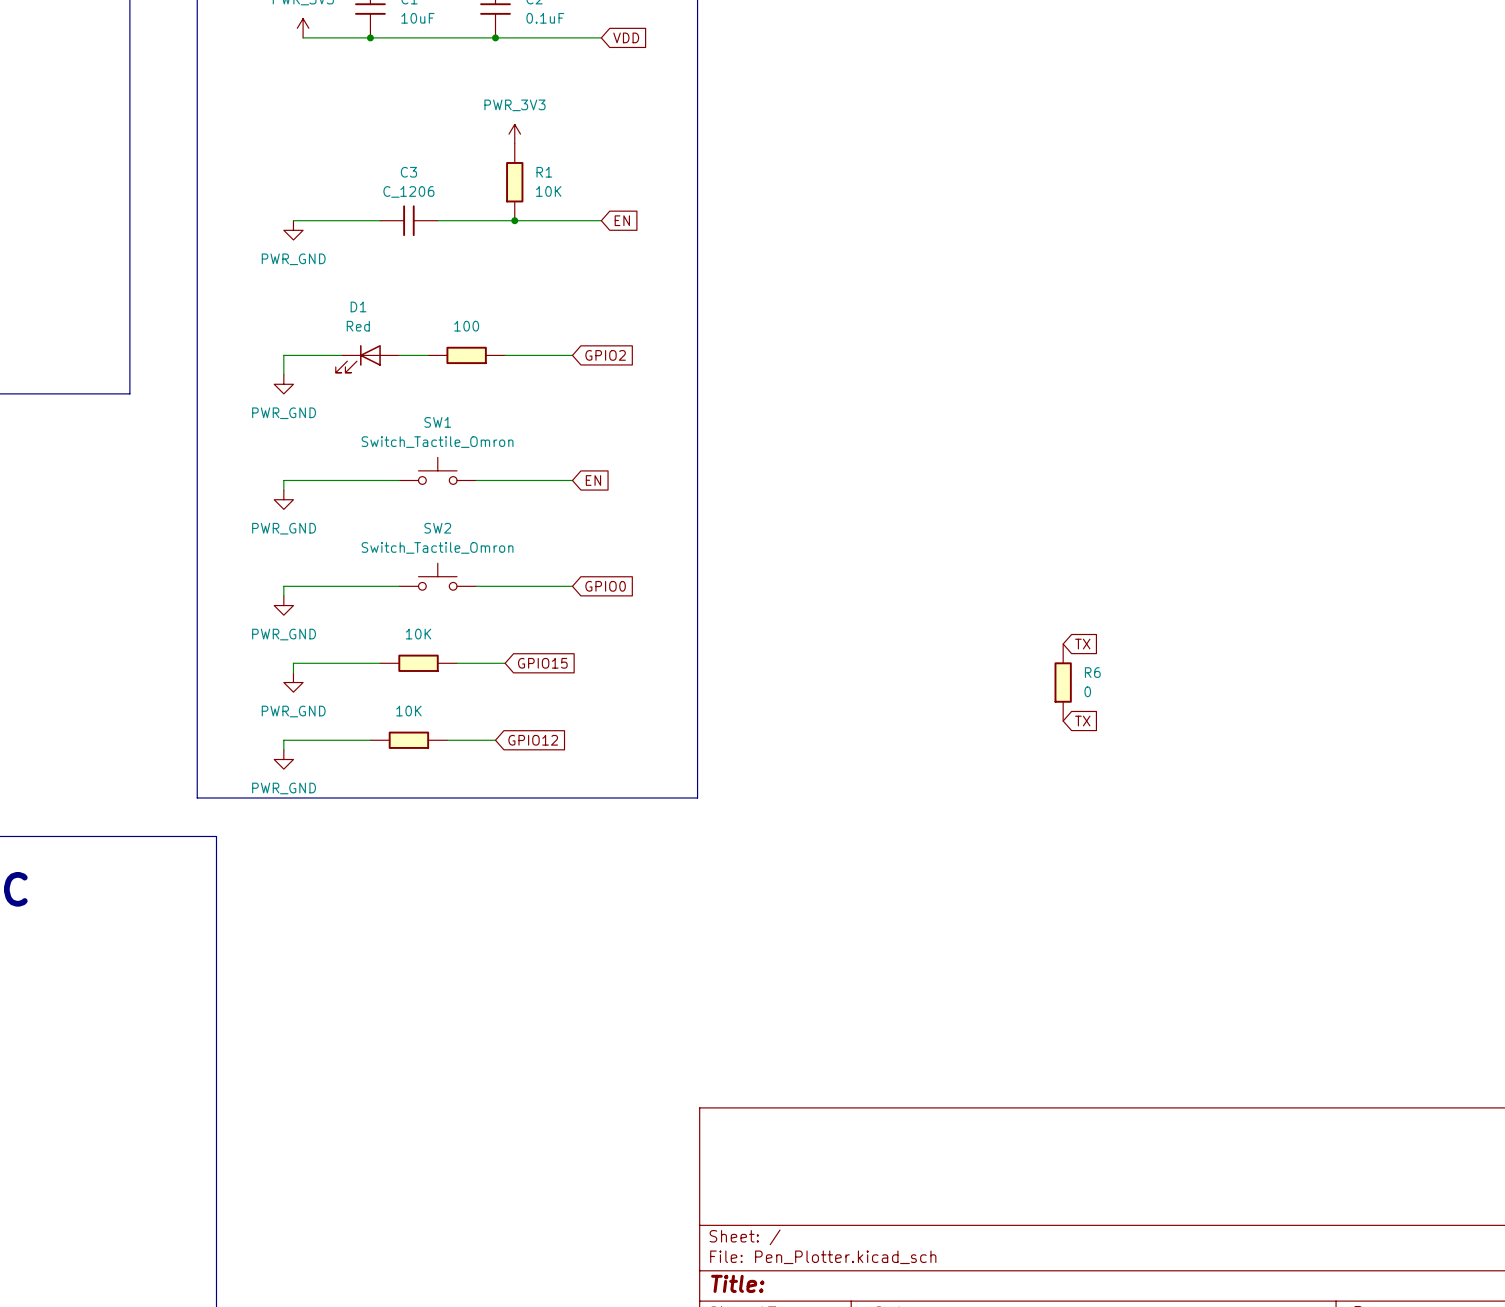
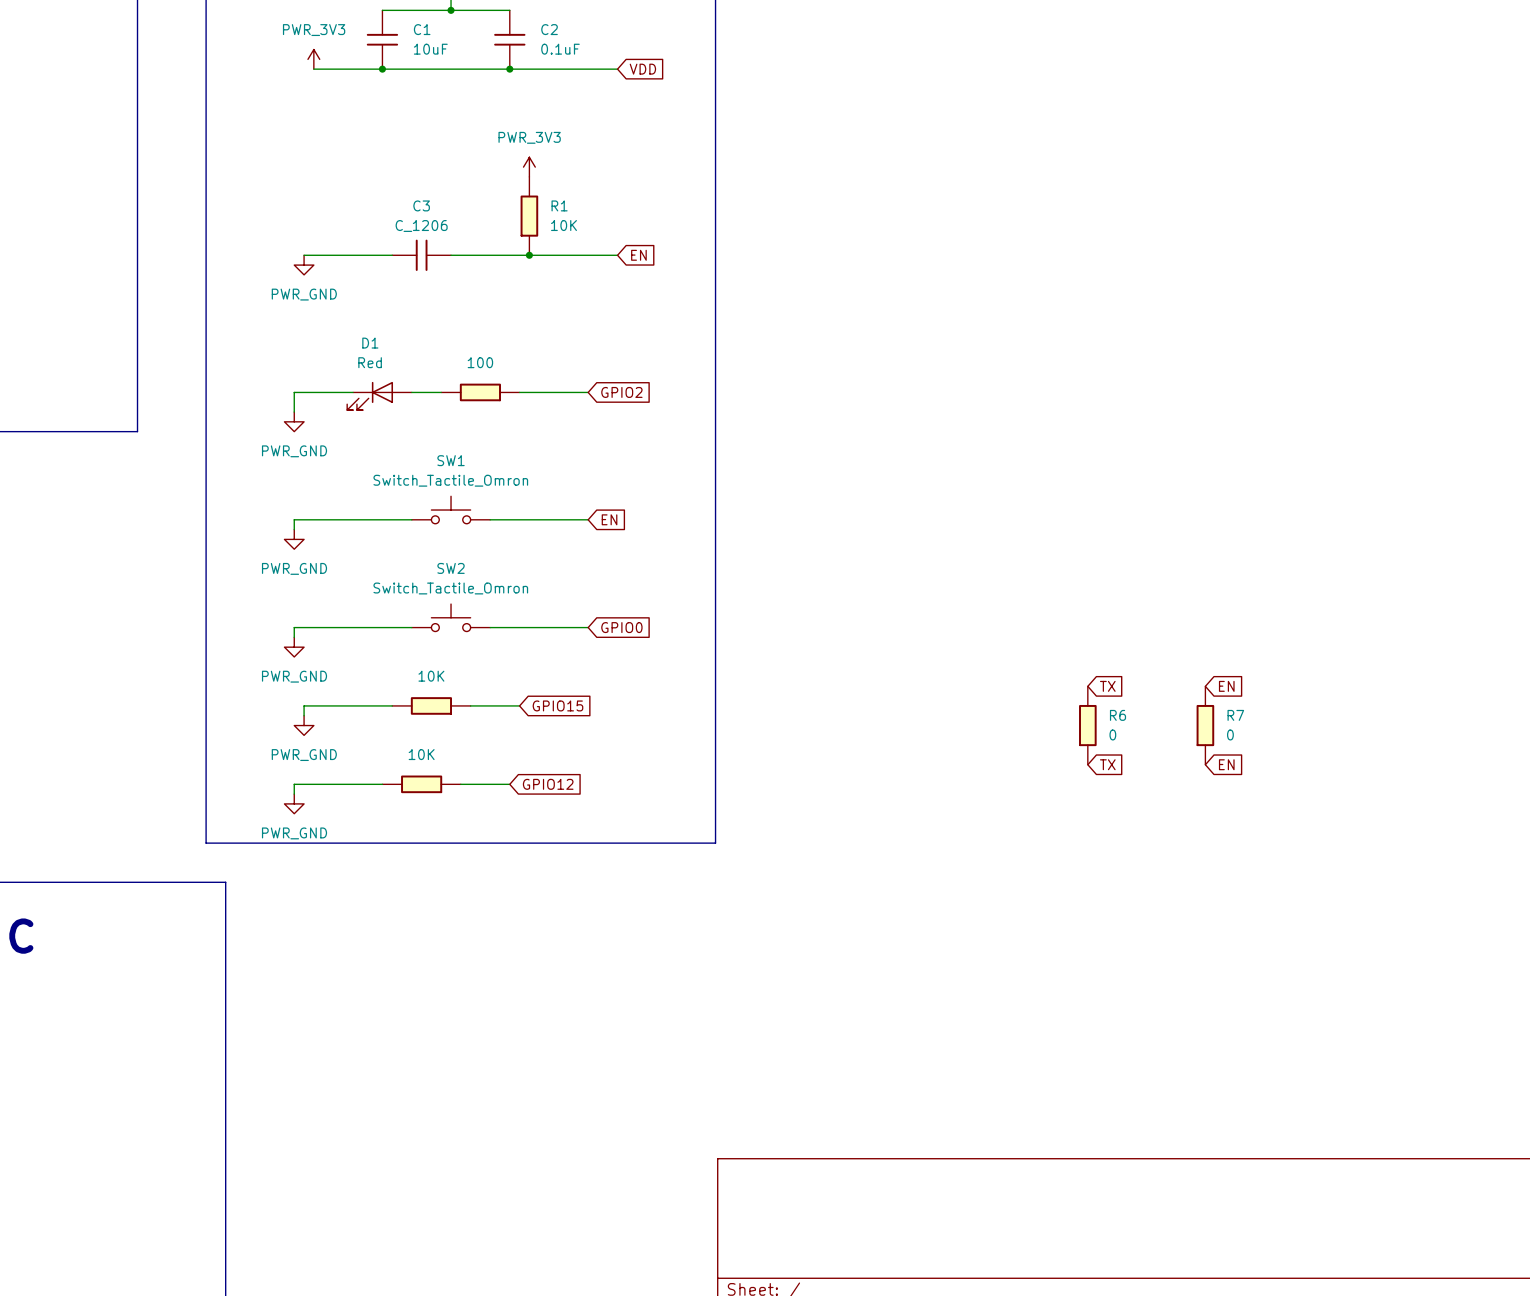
global label: none -> EN (1226, 686)
R7: none -> 0 (1205, 725)
global label: none -> EN (1226, 764)

